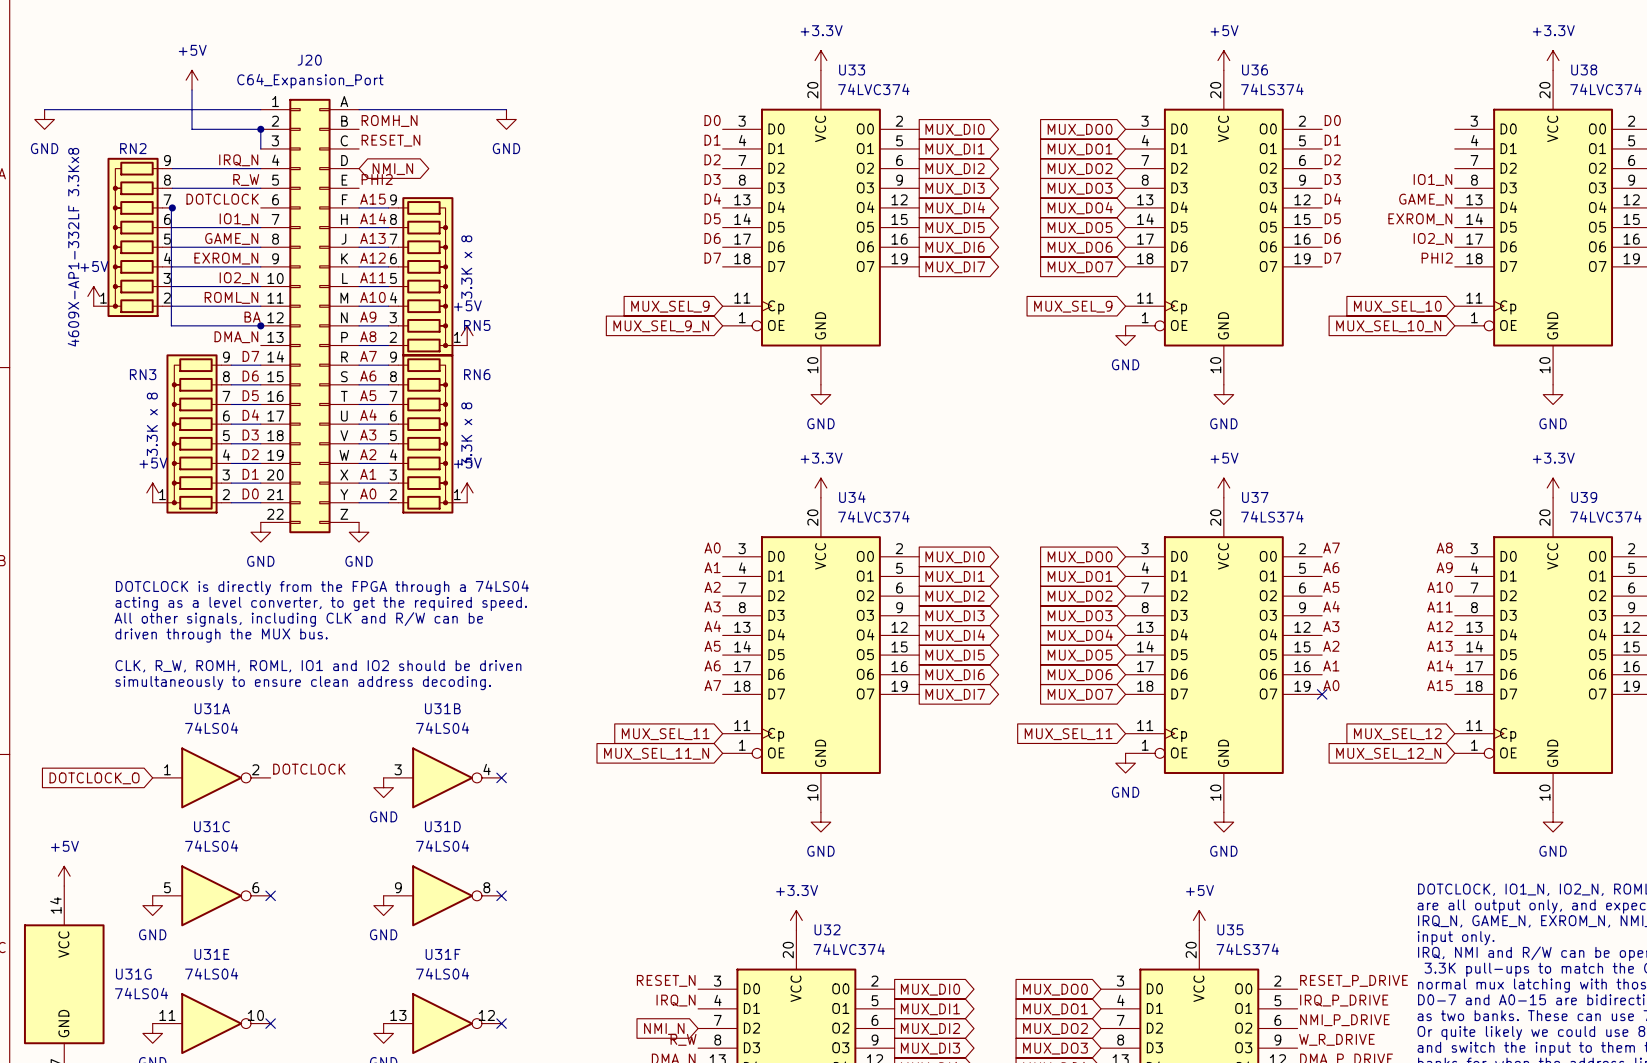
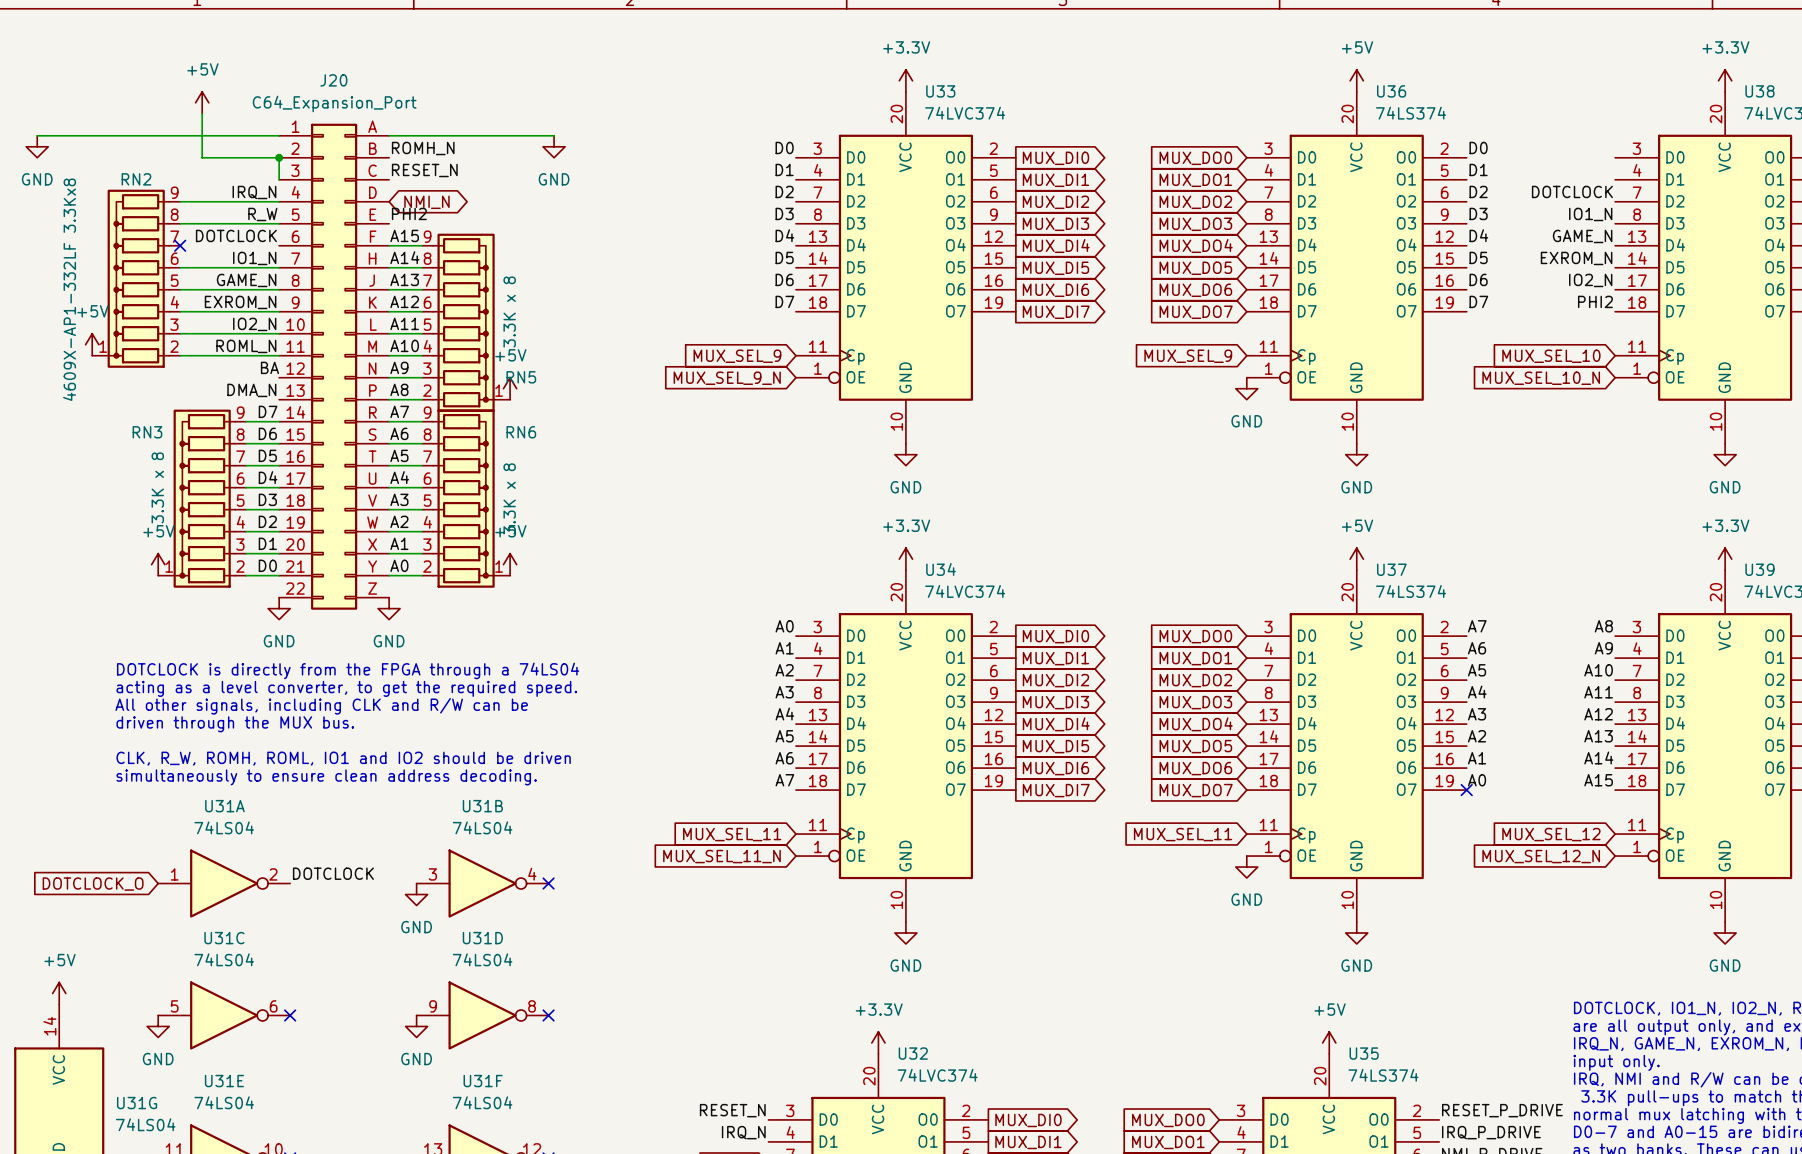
label: none -> DOTCLOCK (1572, 191)
wire: (172, 207) (171, 325) (261, 325) -> none
junction: (172, 207) -> none
no-connect mark: none -> (180, 245)
junction: (260, 325) -> none

